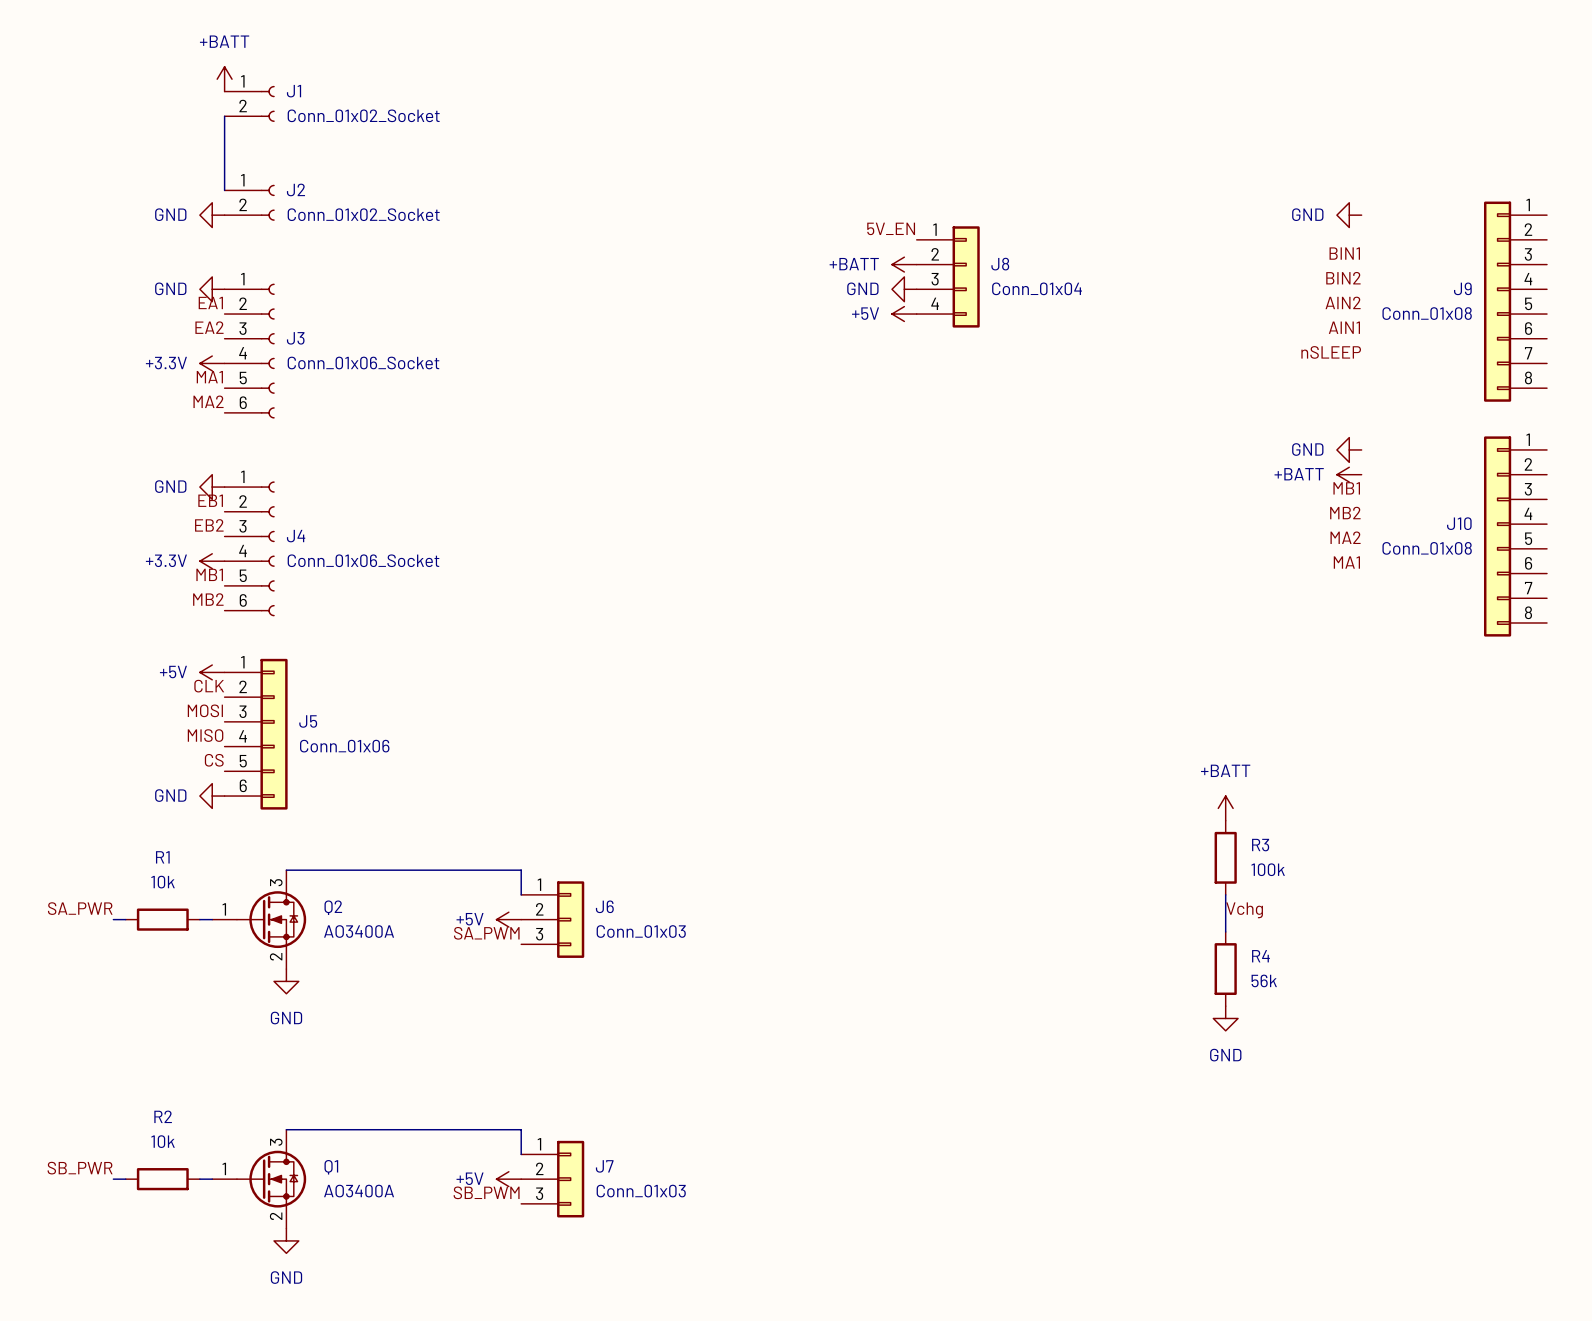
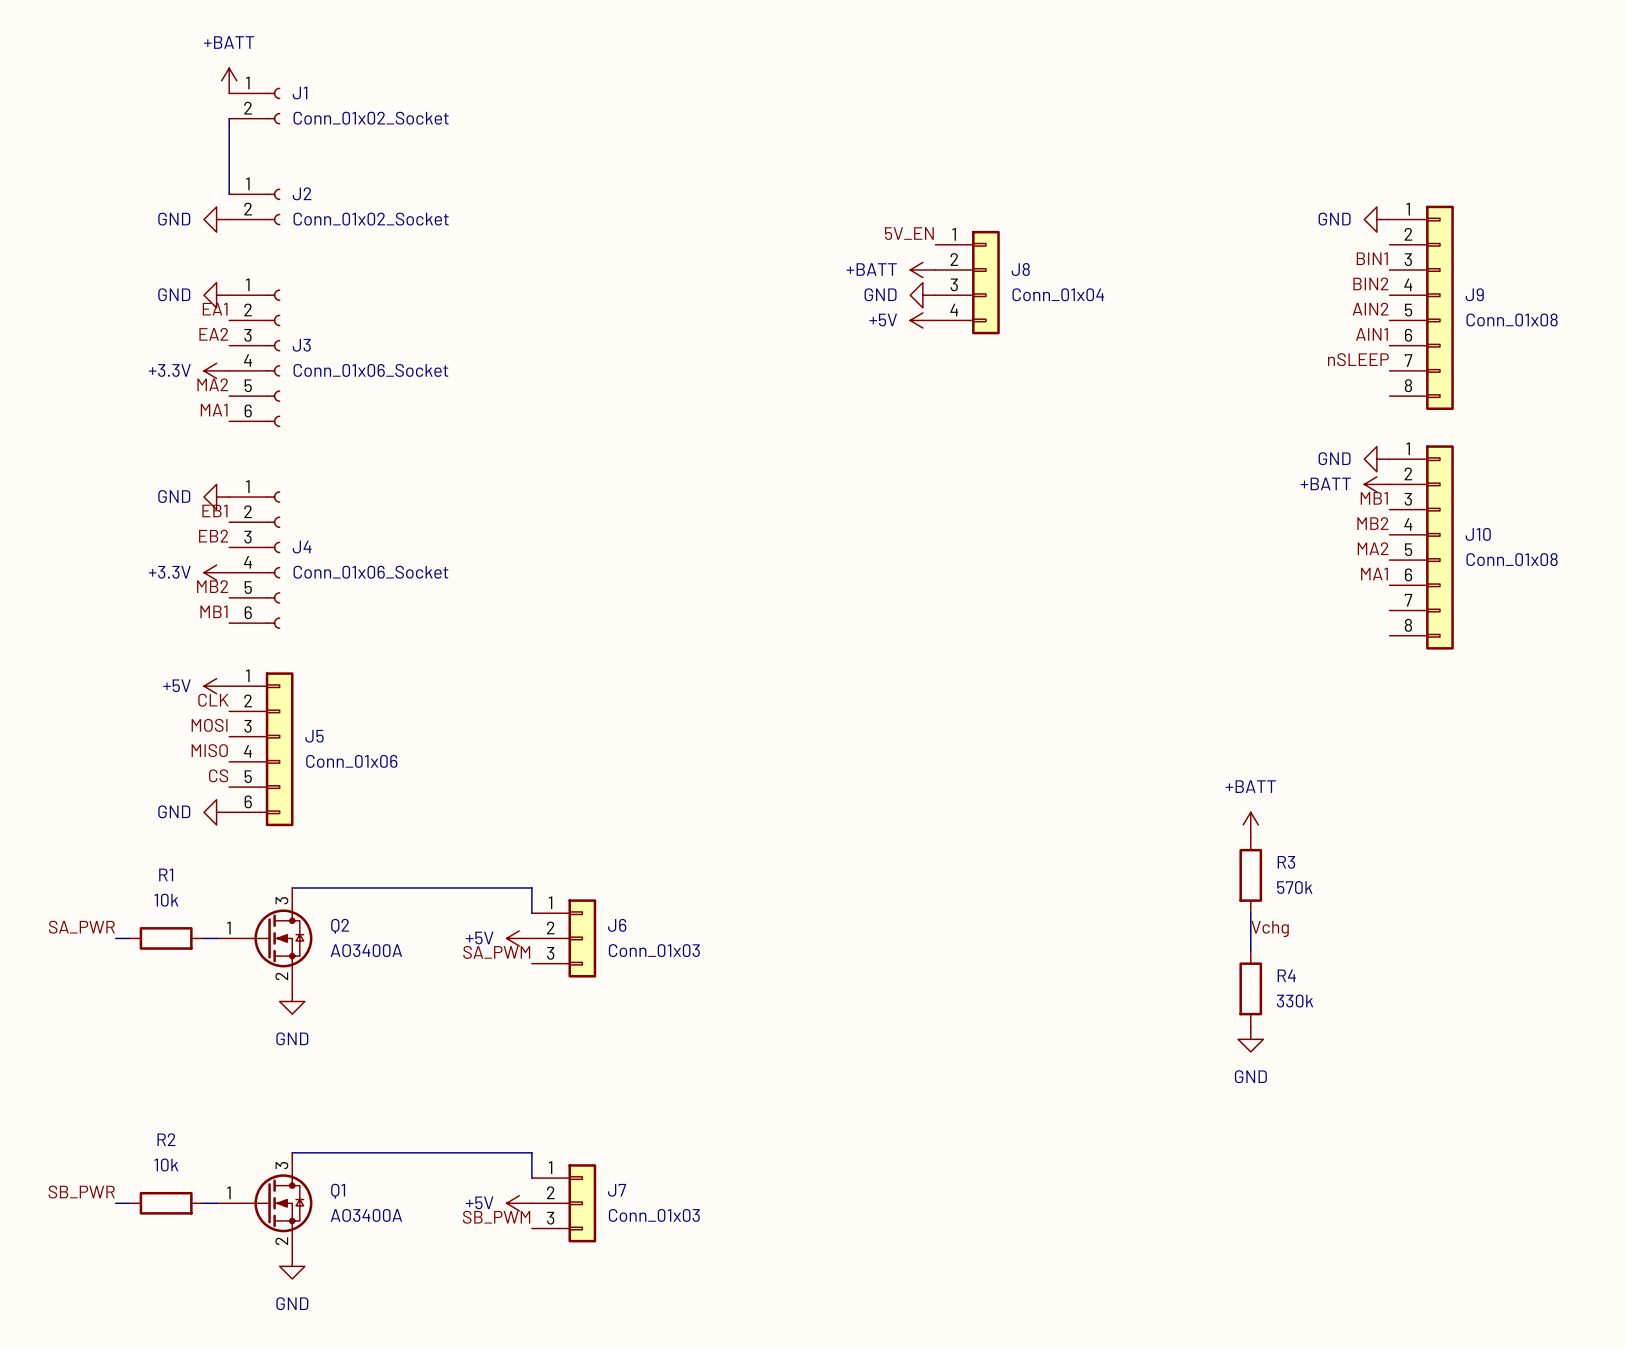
J9 flip: as is (1497, 301) -> left-right (1439, 307)
J9 position: (1515, 301) -> (1421, 307)
label: MA1 (209, 377) -> MA2 (212, 384)
label: MA2 (208, 401) -> MA1 (214, 410)
J10 flip: as is (1497, 536) -> left-right (1439, 547)
J10 position: (1515, 536) -> (1421, 547)
label: MB1 (209, 574) -> MB2 (212, 586)
label: MB2 (208, 599) -> MB1 (213, 611)
R3 value: 100k (1268, 869) -> 570k (1294, 887)
R4 value: 56k (1264, 980) -> 330k (1295, 1001)

